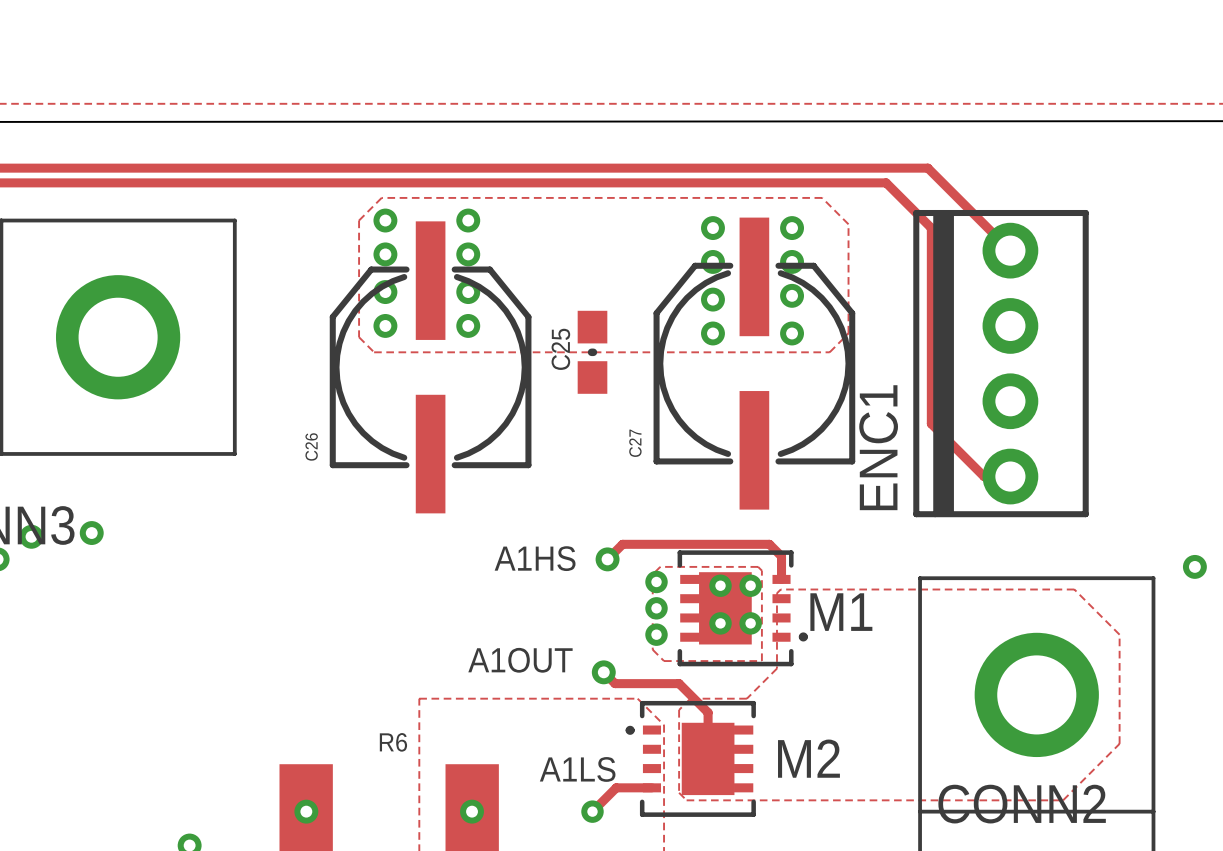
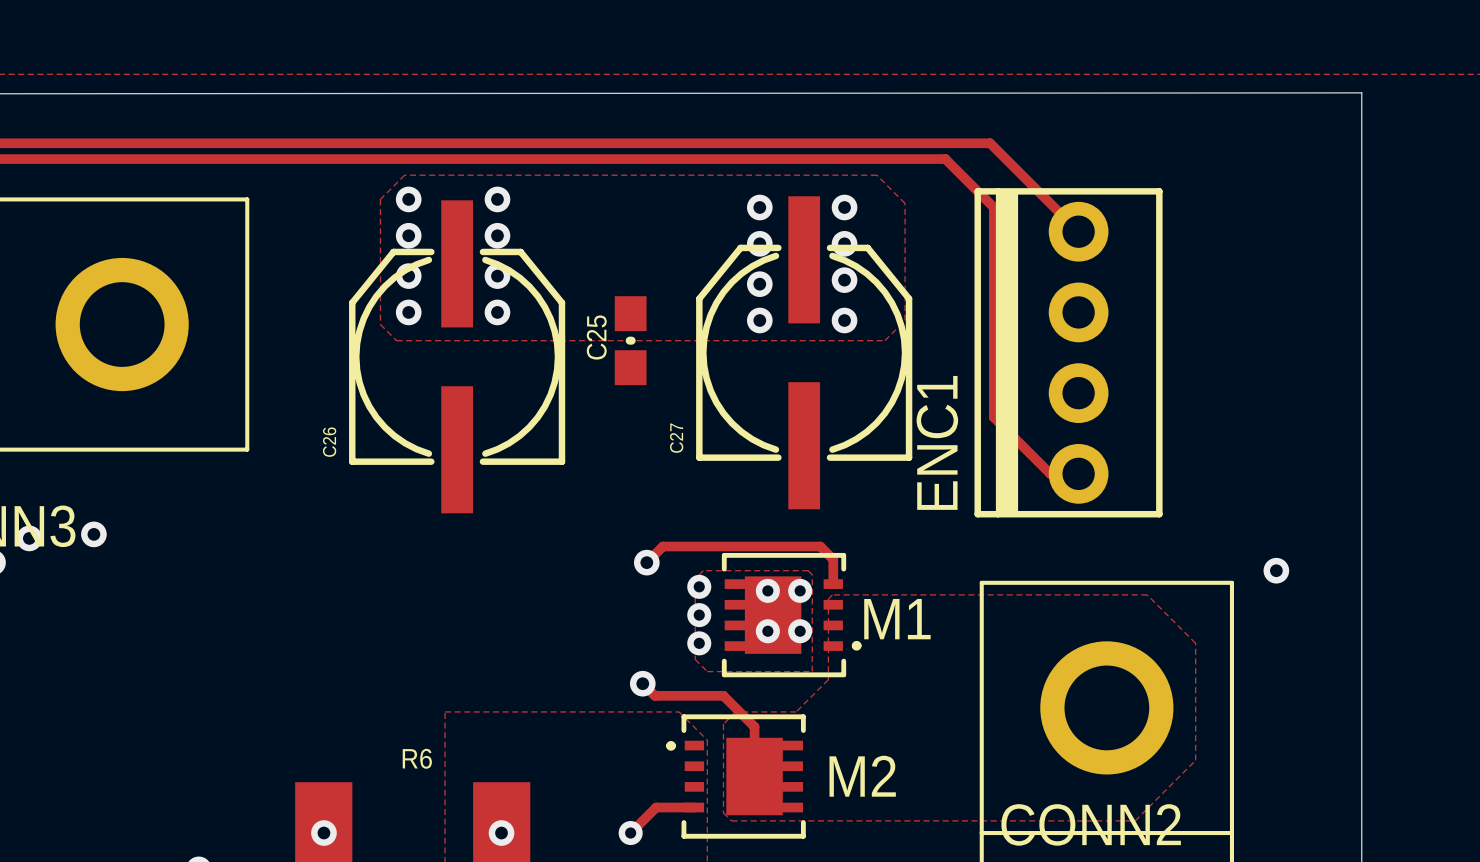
text: A1HS (535, 558) -> none
text: A1OUT (520, 660) -> none
text: A1LS (577, 769) -> none

